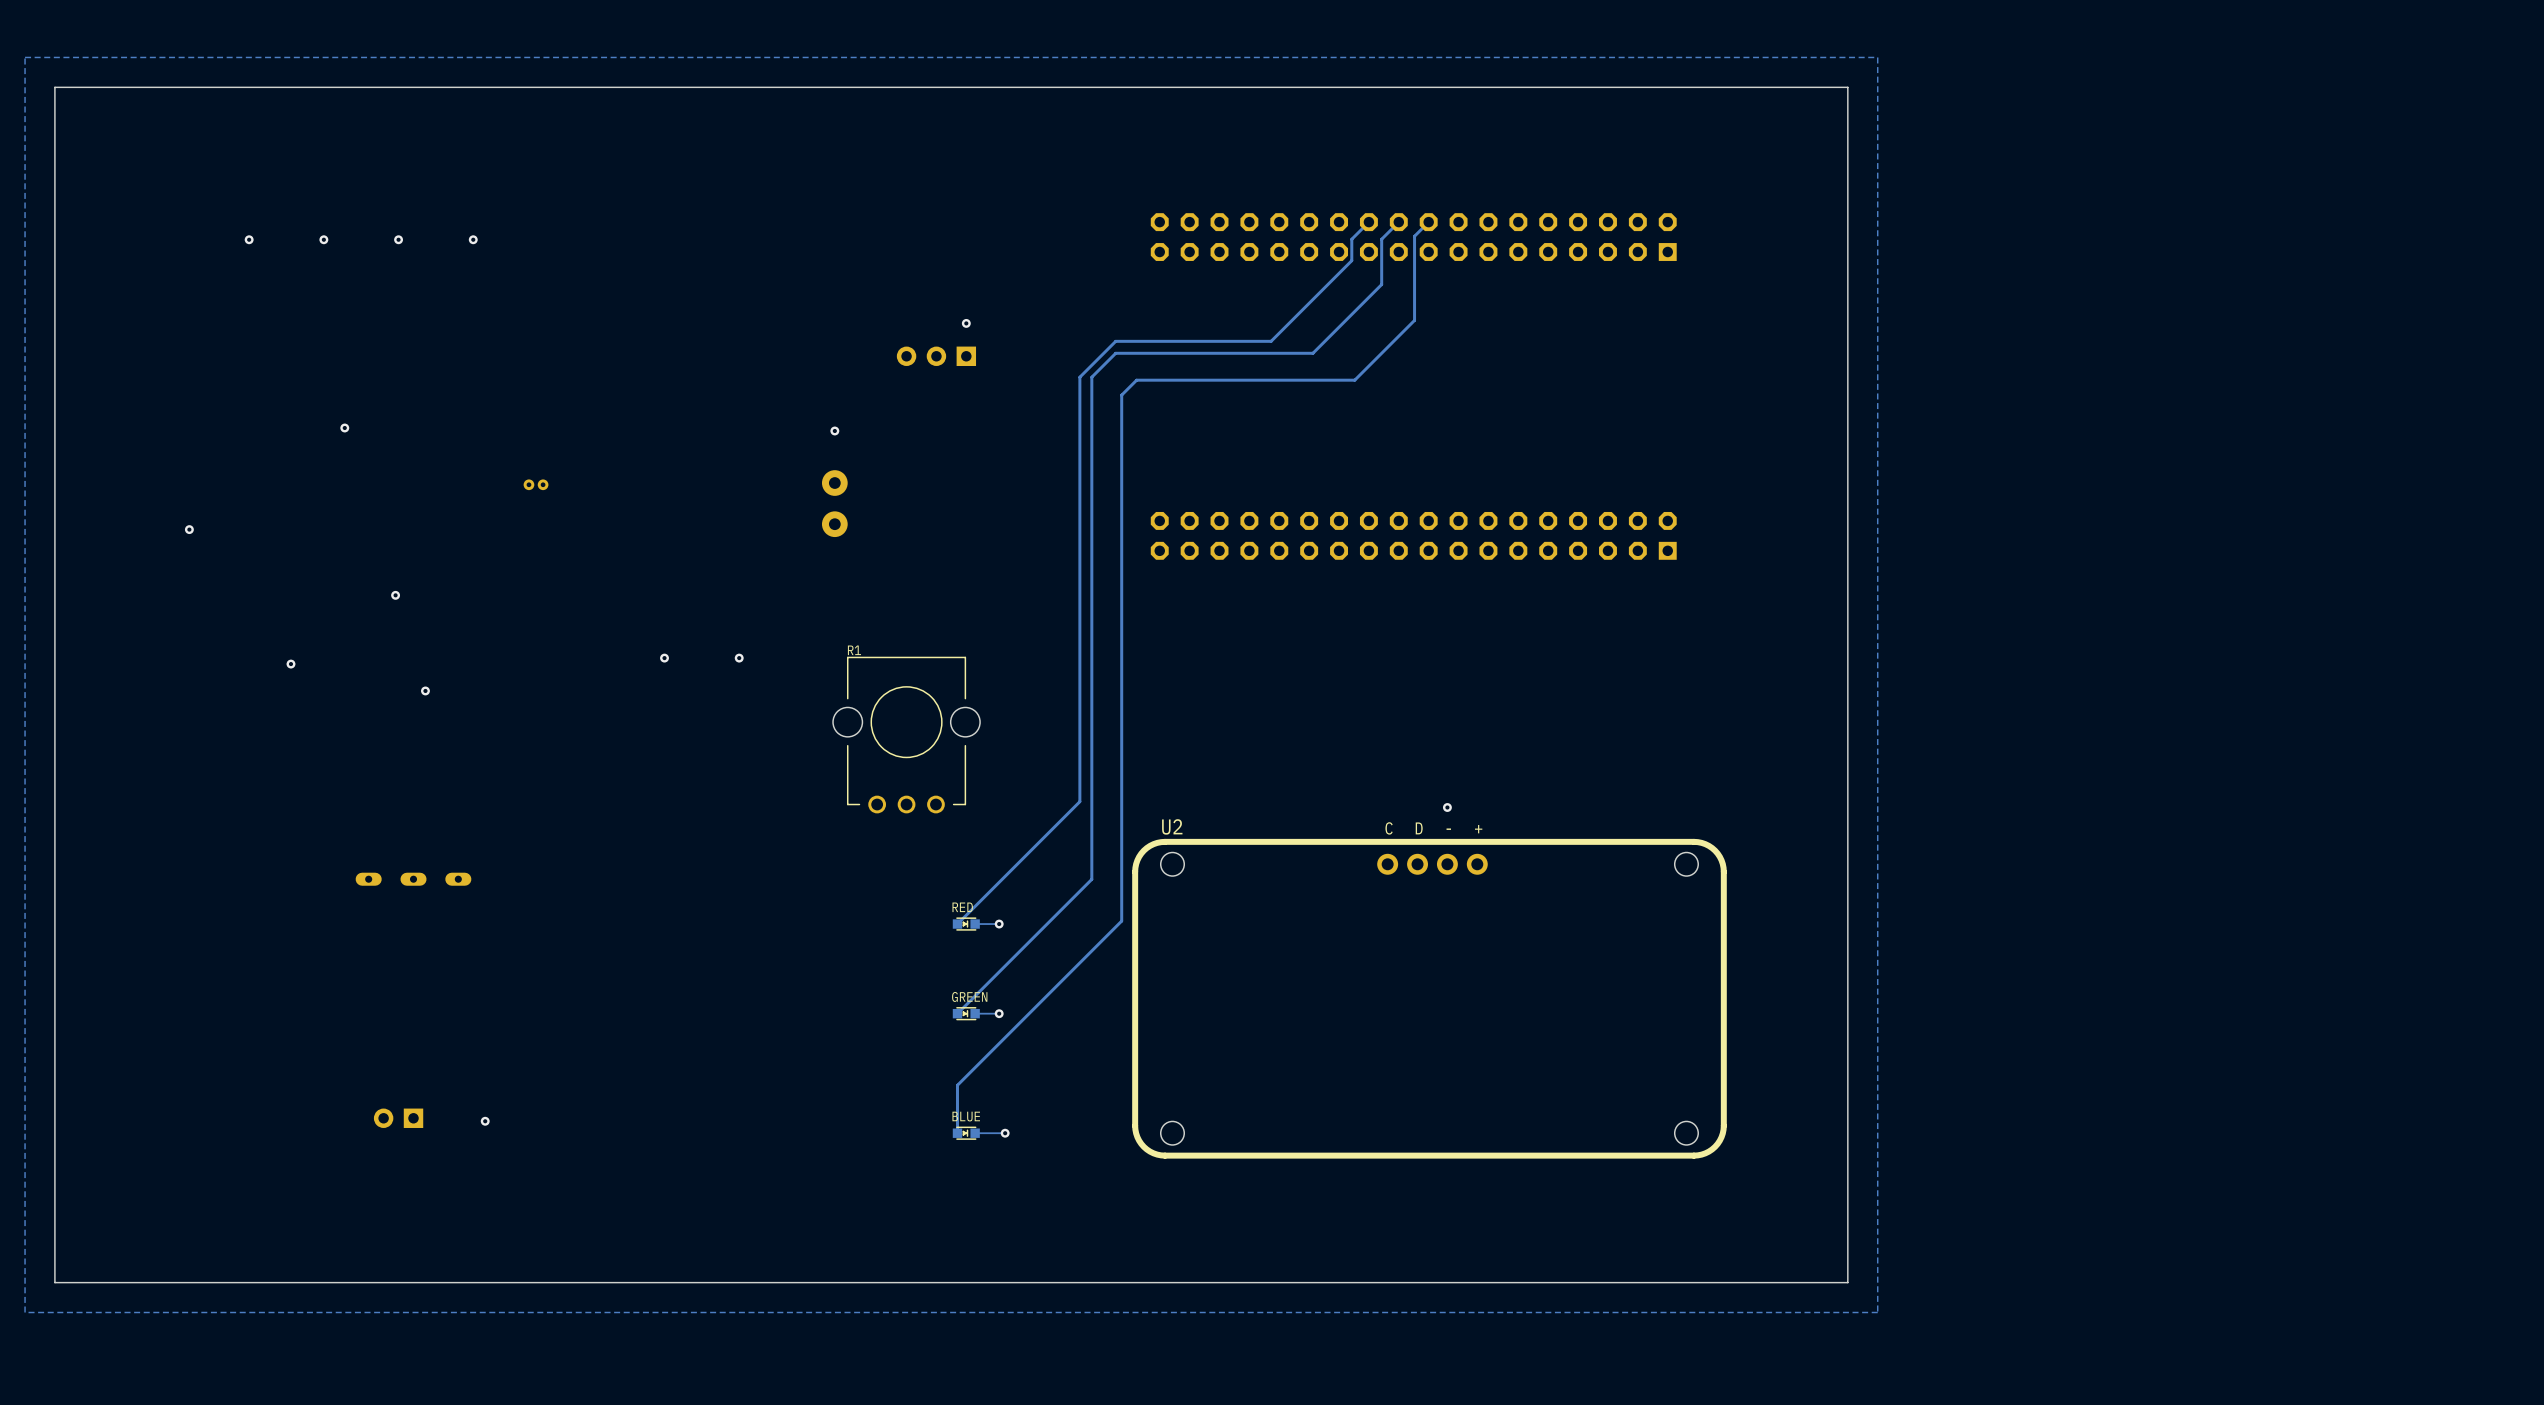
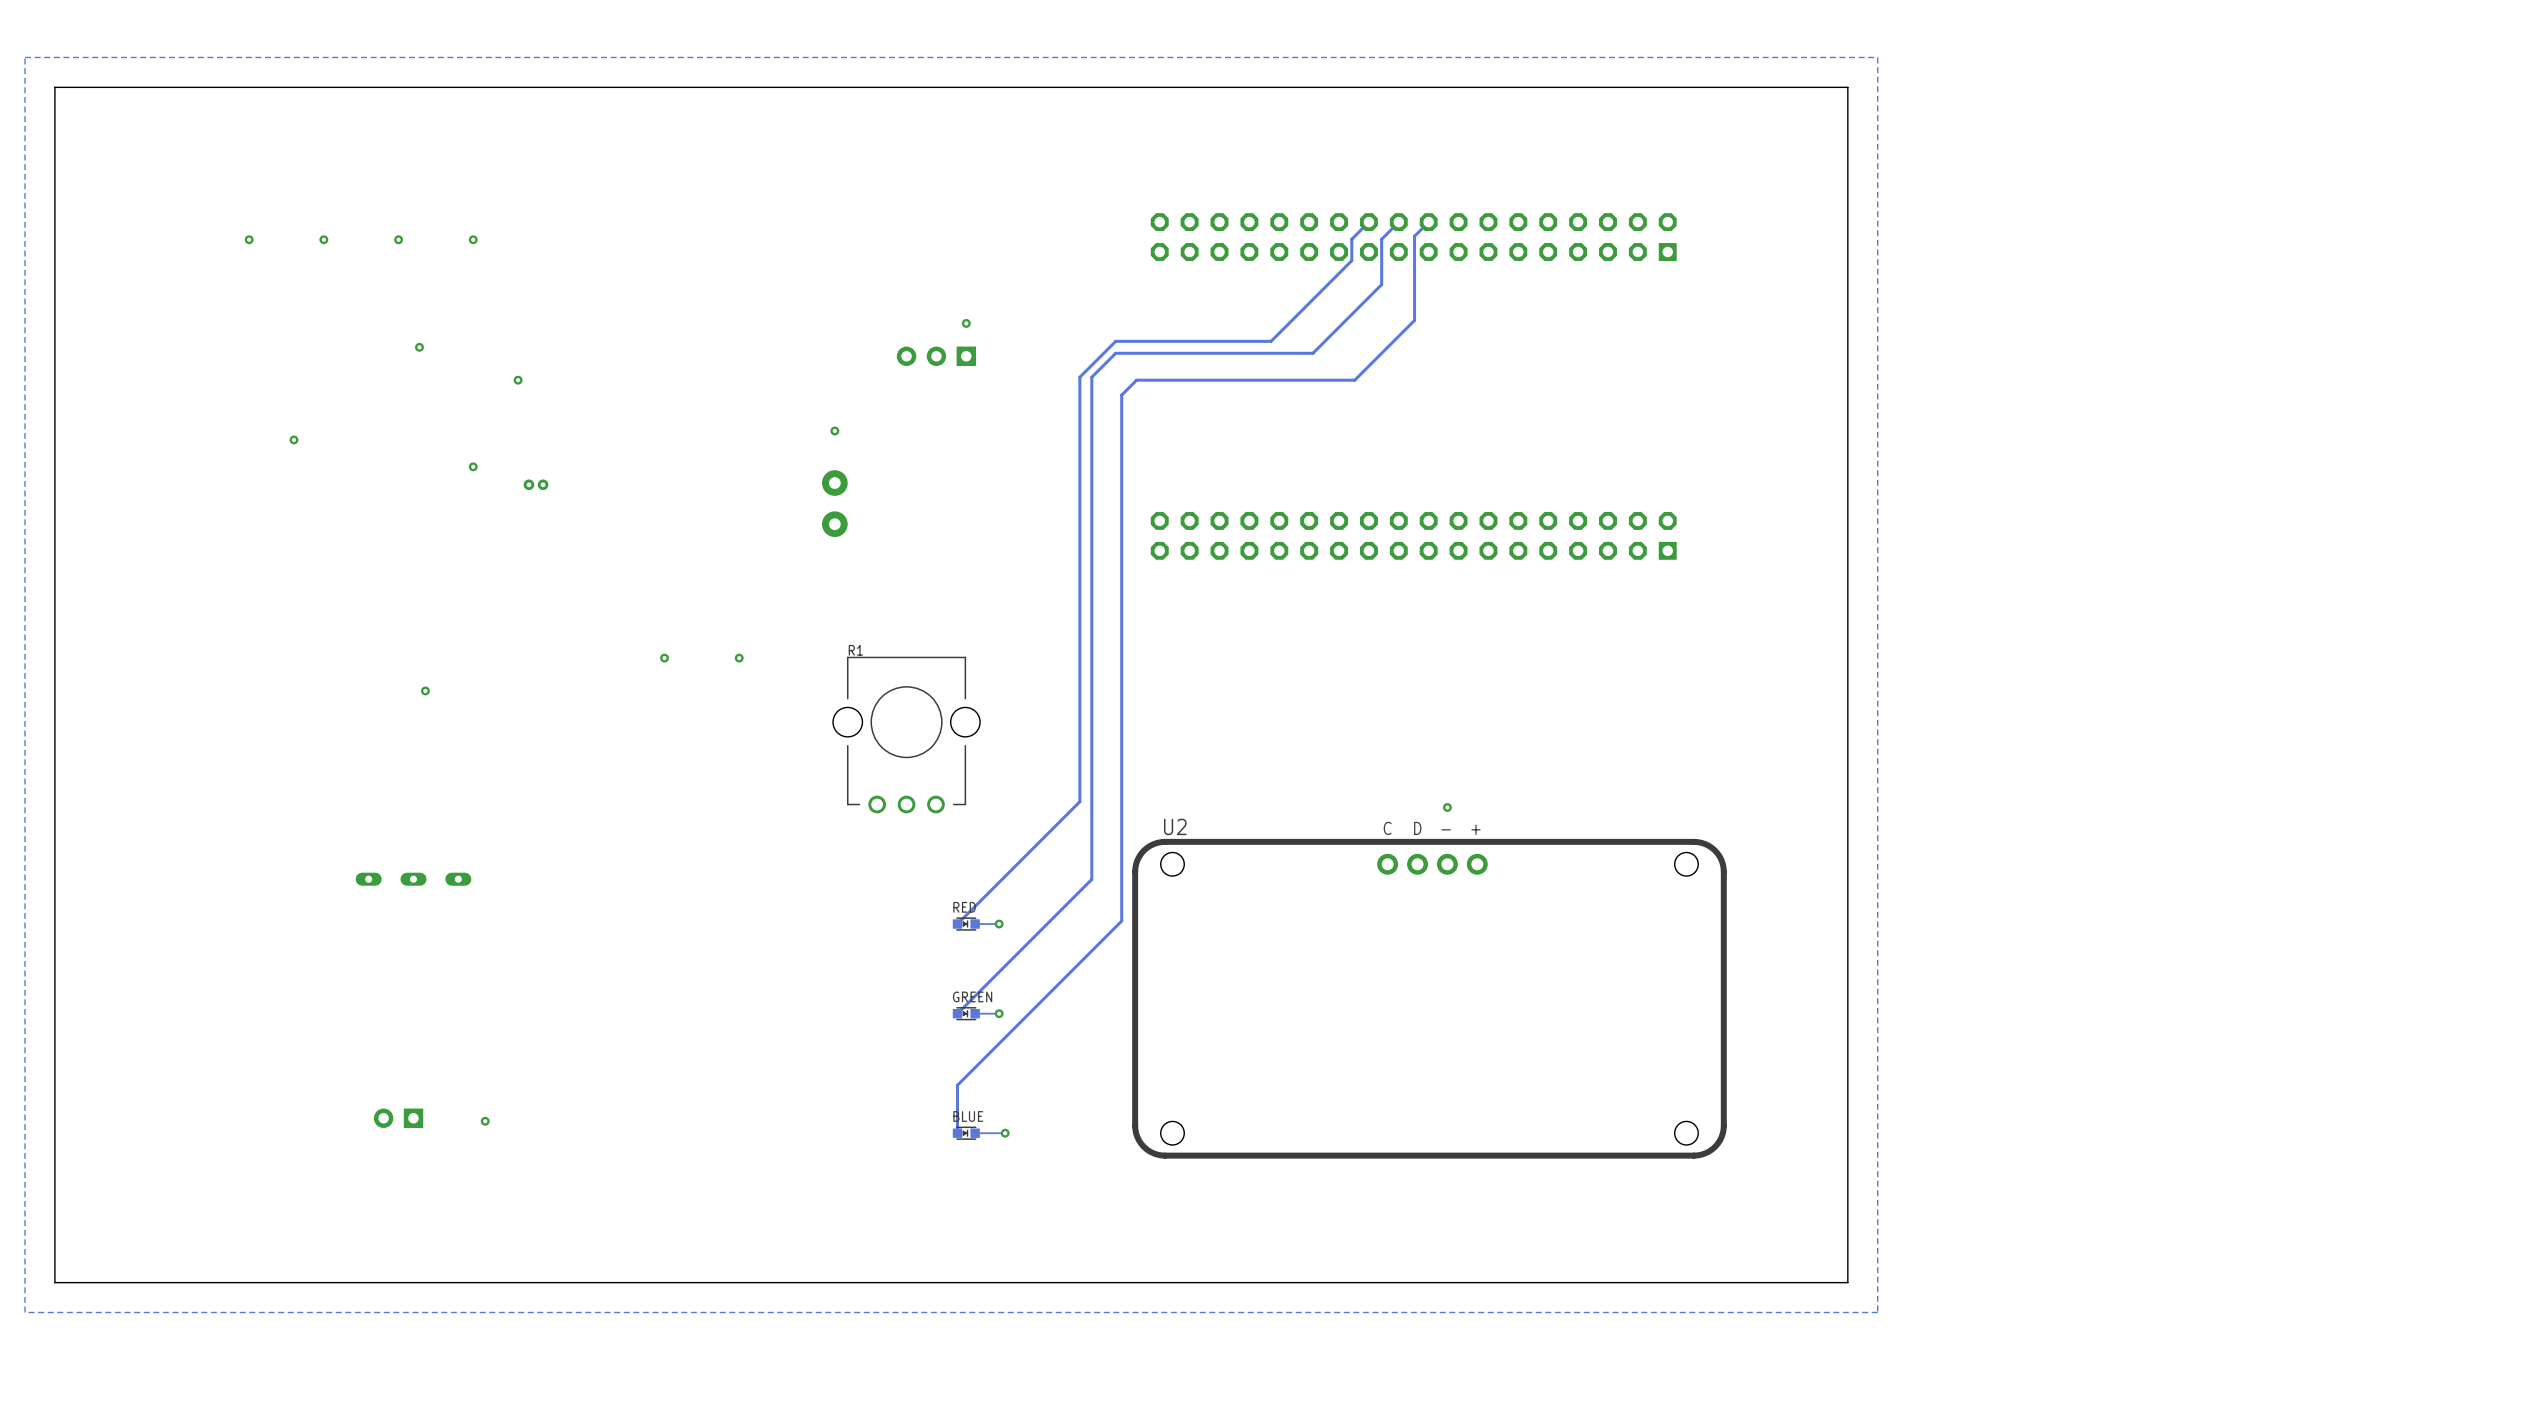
via: none -> (419, 347)
via: none -> (518, 380)
via position: (344, 428) -> (293, 439)
via: none -> (473, 466)
via: (189, 529) -> none
via: (395, 595) -> none
via: (290, 664) -> none

